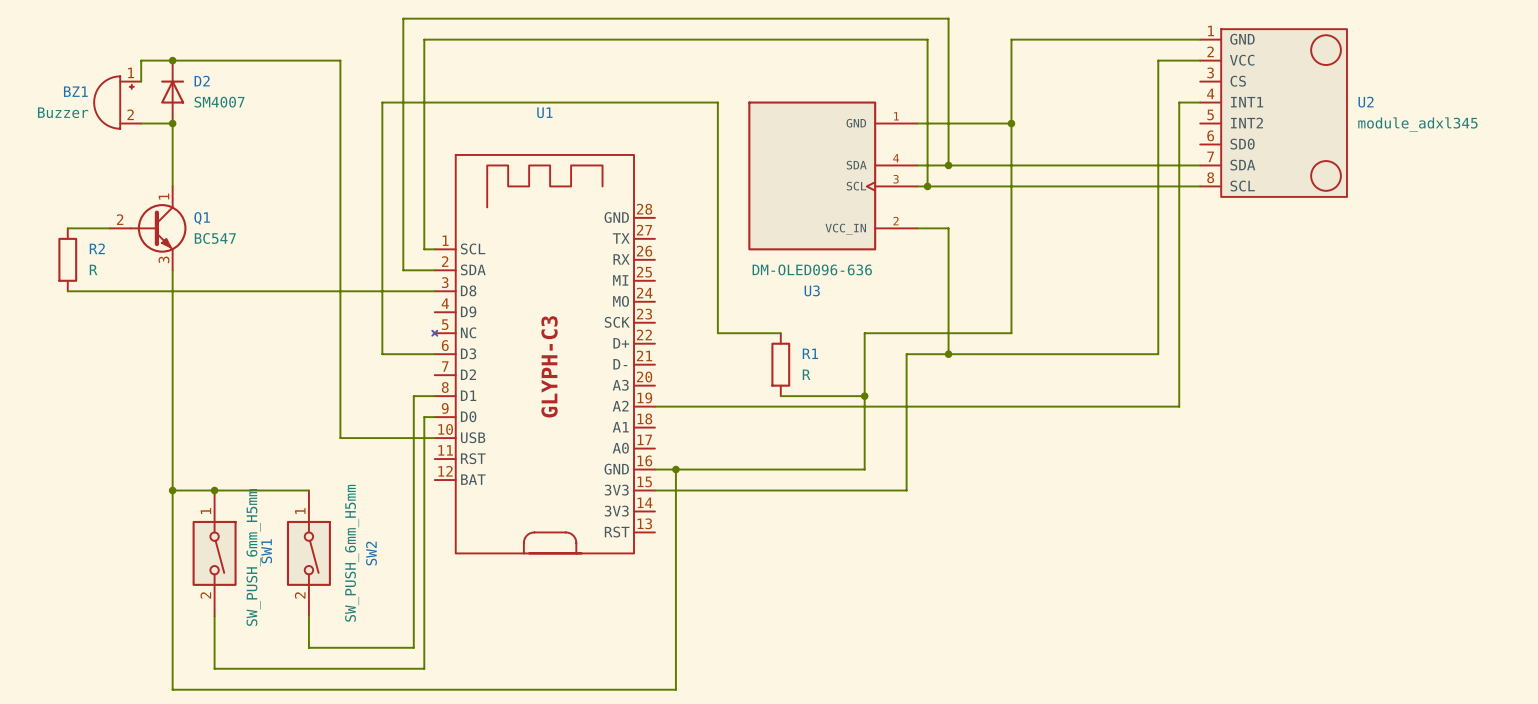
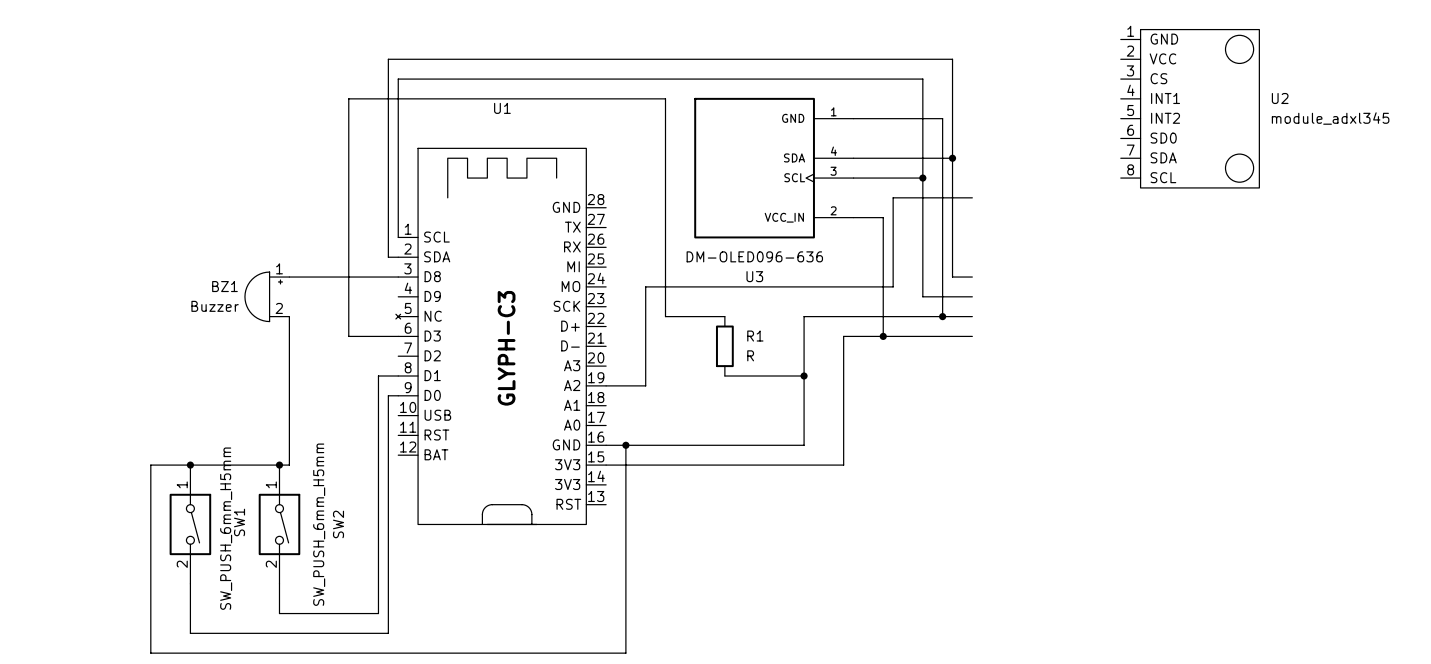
wire: (1200, 39) (1011, 39) (1011, 123) -> none
junction: (172, 60) -> none
wire: (424, 60) (424, 39) (927, 39) (927, 186) -> (388, 59) (952, 59) (952, 277) (972, 277)
wire: (1200, 60) (1158, 60) (1158, 354) (1042, 354) -> none
wire: (141, 81) (141, 60) (340, 60) (340, 438) (434, 438) -> none
D2: SM4007 (172, 92) -> none
BZ1 position: (117, 102) -> (267, 296)
wire: (1200, 102) (1179, 102) (1179, 406) (696, 406) -> (972, 197) (893, 197) (893, 286) (645, 286) (645, 385)
wire: (141, 123) (172, 123) (172, 186) -> none
junction: (172, 123) -> none
junction: (1011, 123) -> none
wire: (948, 165) (948, 18) (403, 18) (403, 270) (424, 270) -> none
junction: (948, 165) -> none
wire: (1021, 165) (1200, 165) -> none
junction: none -> (952, 158)
junction: (927, 186) -> none
wire: (990, 186) (1200, 186) -> none
junction: none -> (922, 178)
wire: (67, 228) (109, 228) -> none
Q1: BC547 (148, 228) -> none
wire: (424, 249) (434, 249) -> (388, 237) (388, 257)
wire: none -> (398, 237) (398, 79) (922, 79) (922, 296) (972, 296)
R2: R (67, 259) -> none
wire: (172, 270) (172, 490) -> none
wire: (67, 291) (319, 291) -> none
wire: none -> (289, 316) (289, 465) (279, 465)
wire: none -> (942, 316) (972, 316)
junction: none -> (942, 316)
junction: (172, 490) -> none
junction: none -> (279, 465)

